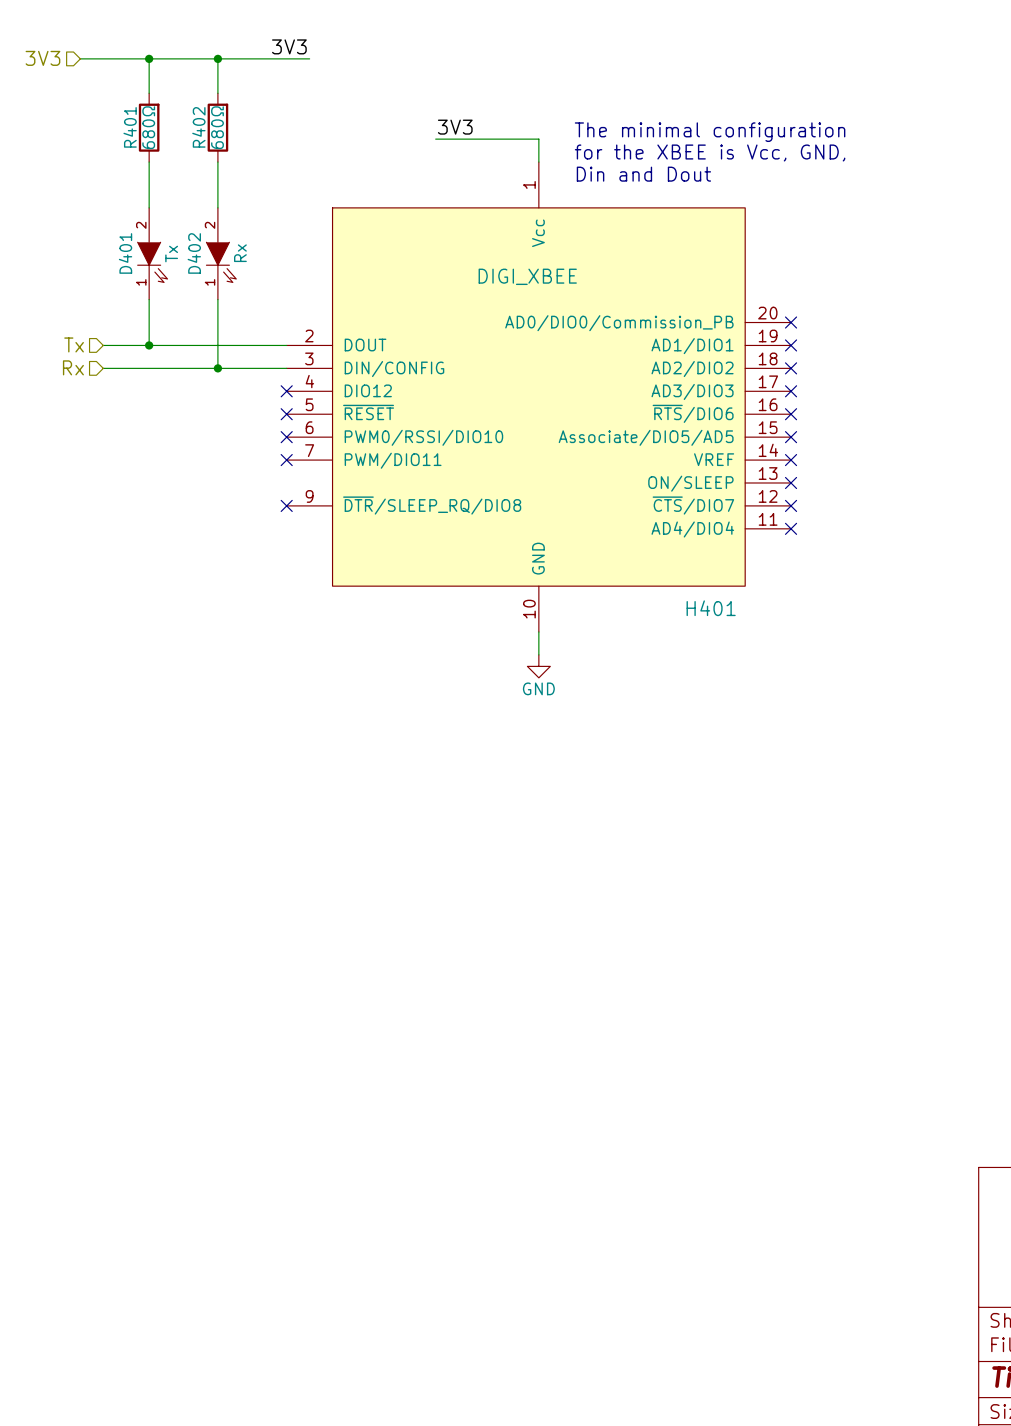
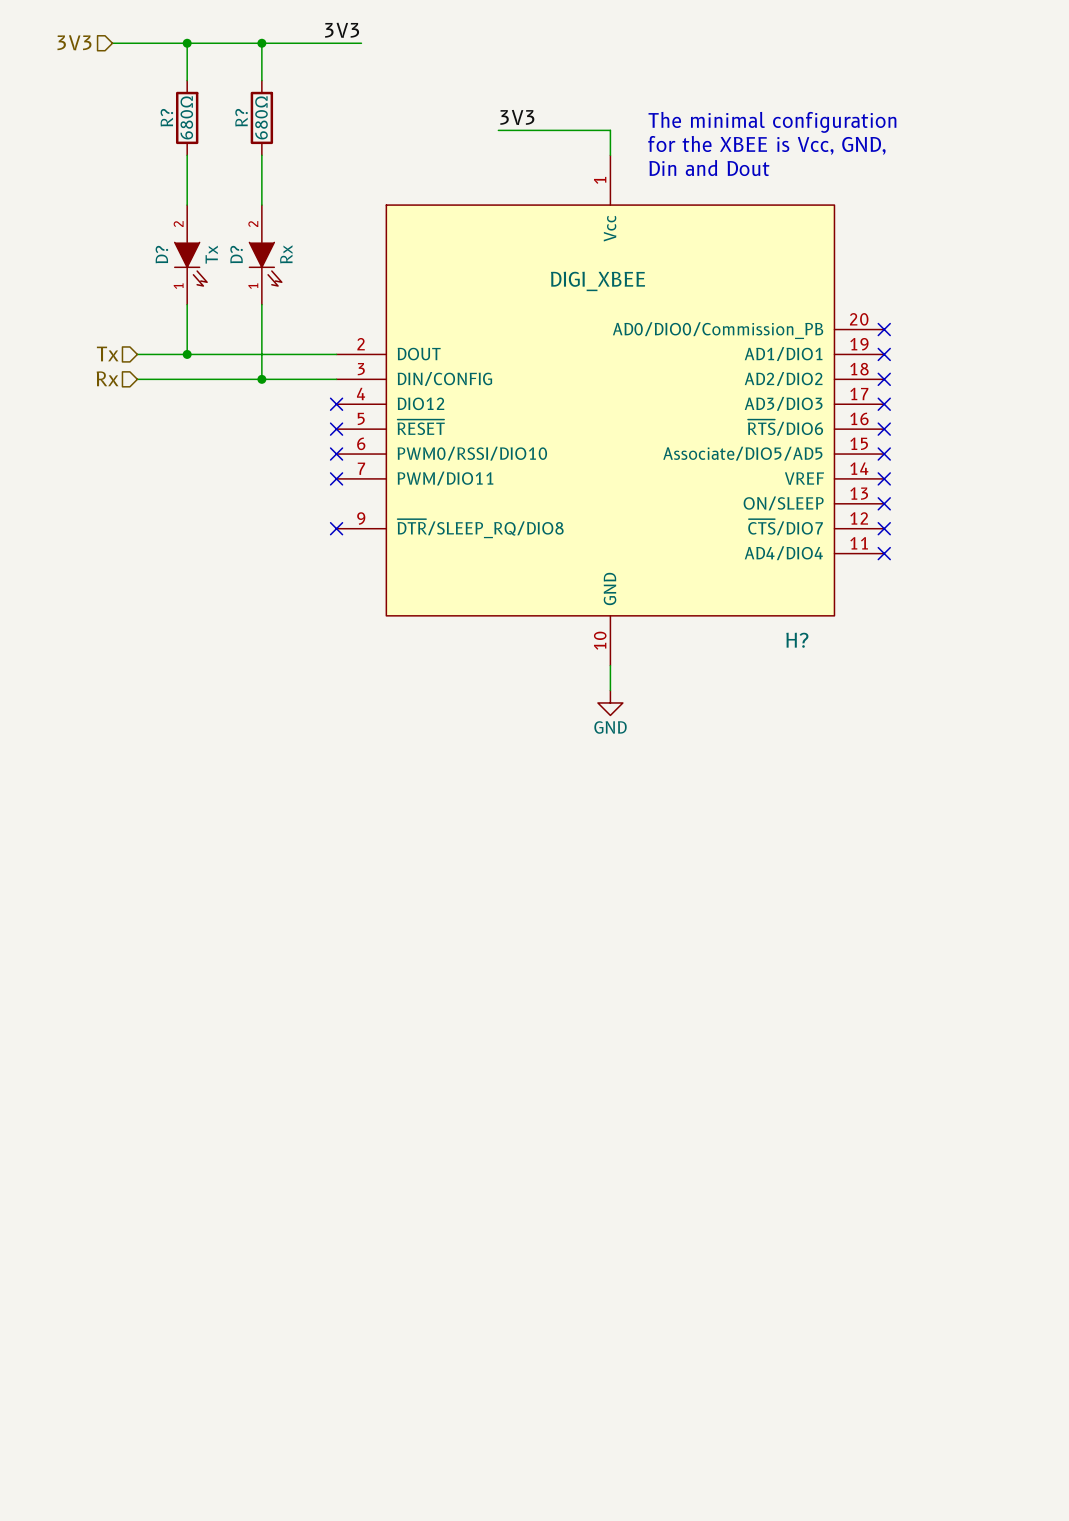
R401 name: R401 (130, 127) -> R? (166, 117)
R402 name: R402 (198, 127) -> R? (241, 117)
D401 name: D401 (125, 253) -> D? (161, 254)
D402 name: D402 (194, 253) -> D? (236, 254)
H401 name: H401 (711, 608) -> H? (797, 640)

